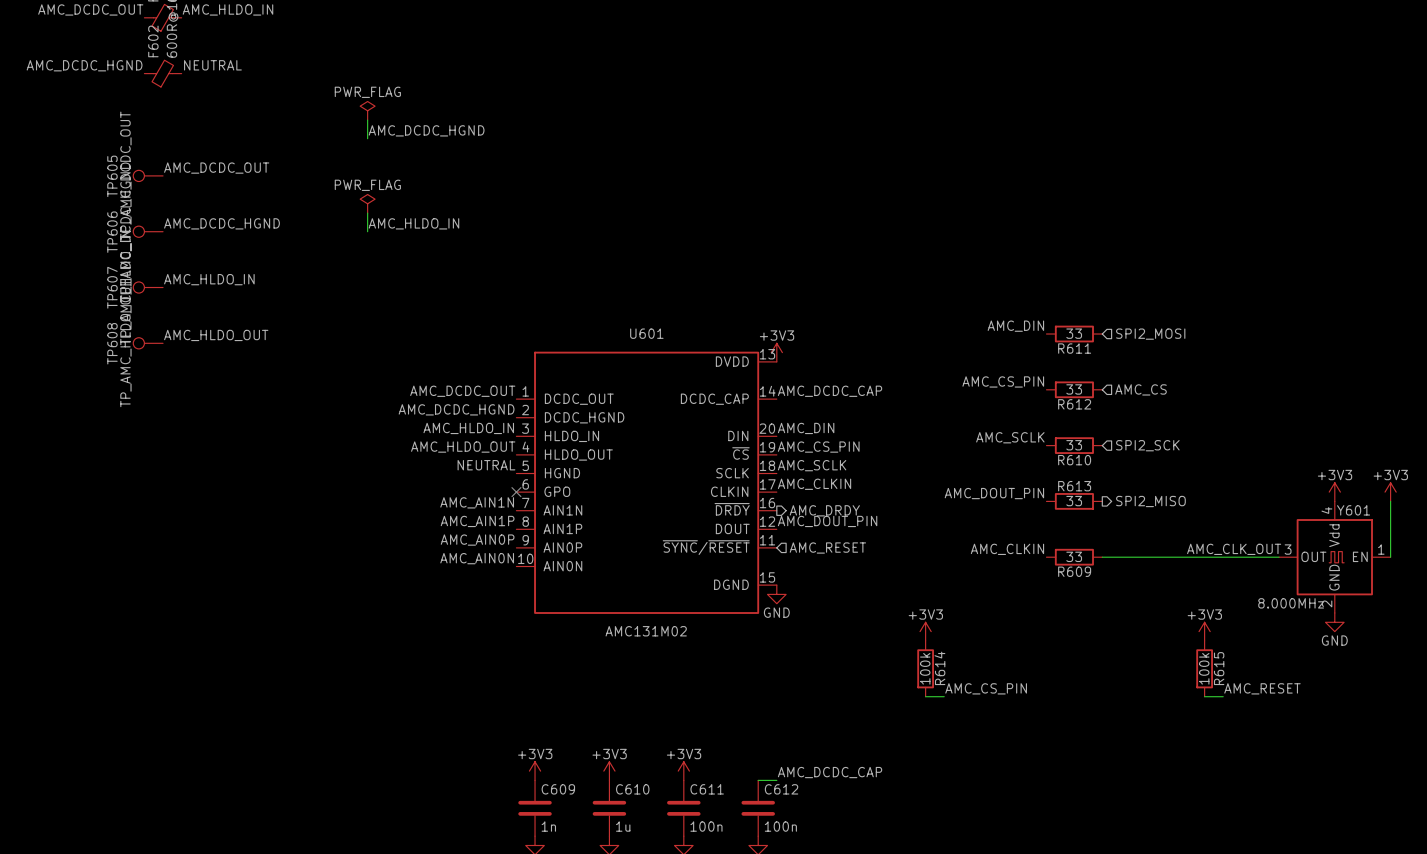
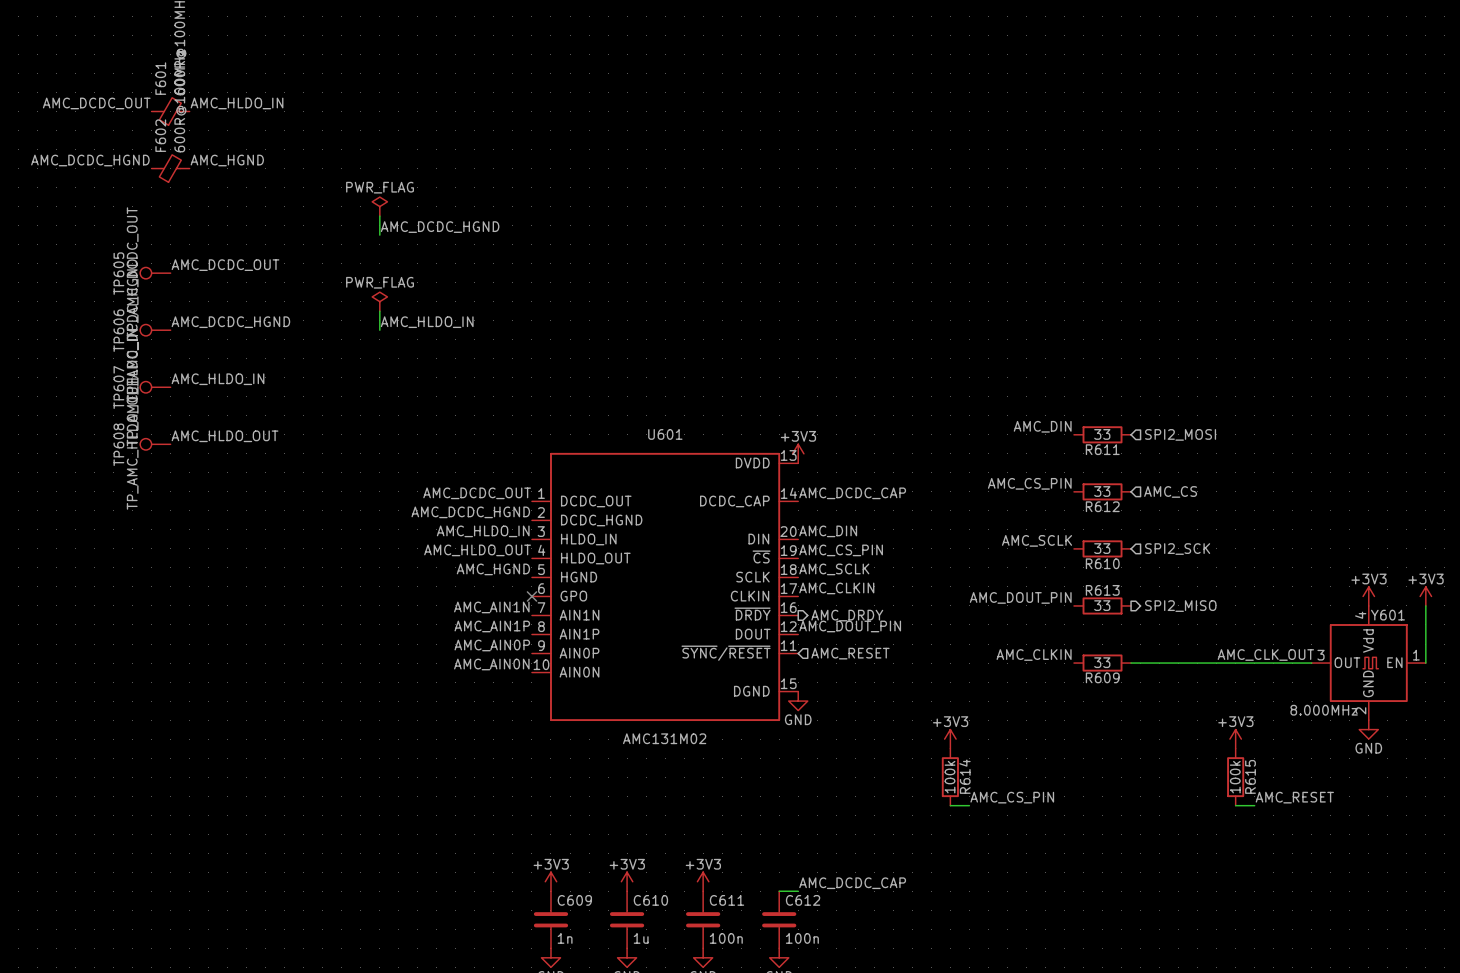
label: NEUTRAL (212, 65) -> AMC_HGND (227, 160)
label: NEUTRAL (486, 465) -> AMC_HGND (493, 569)

